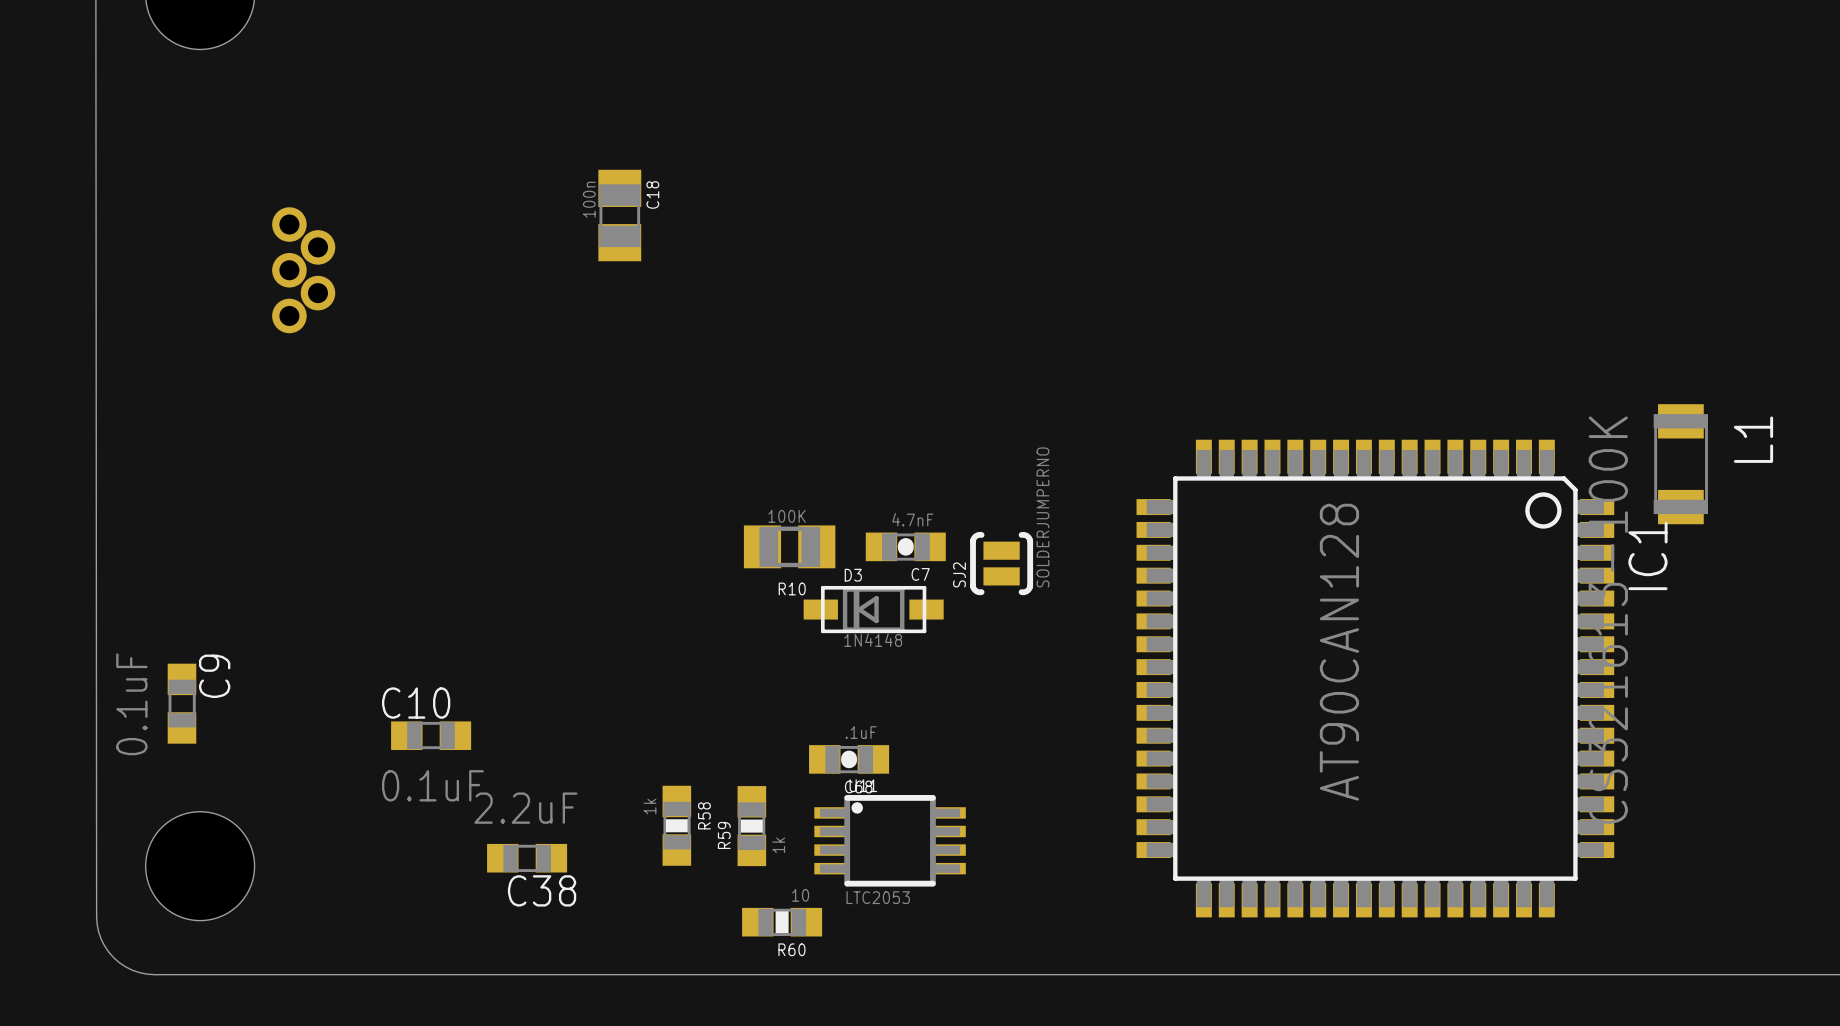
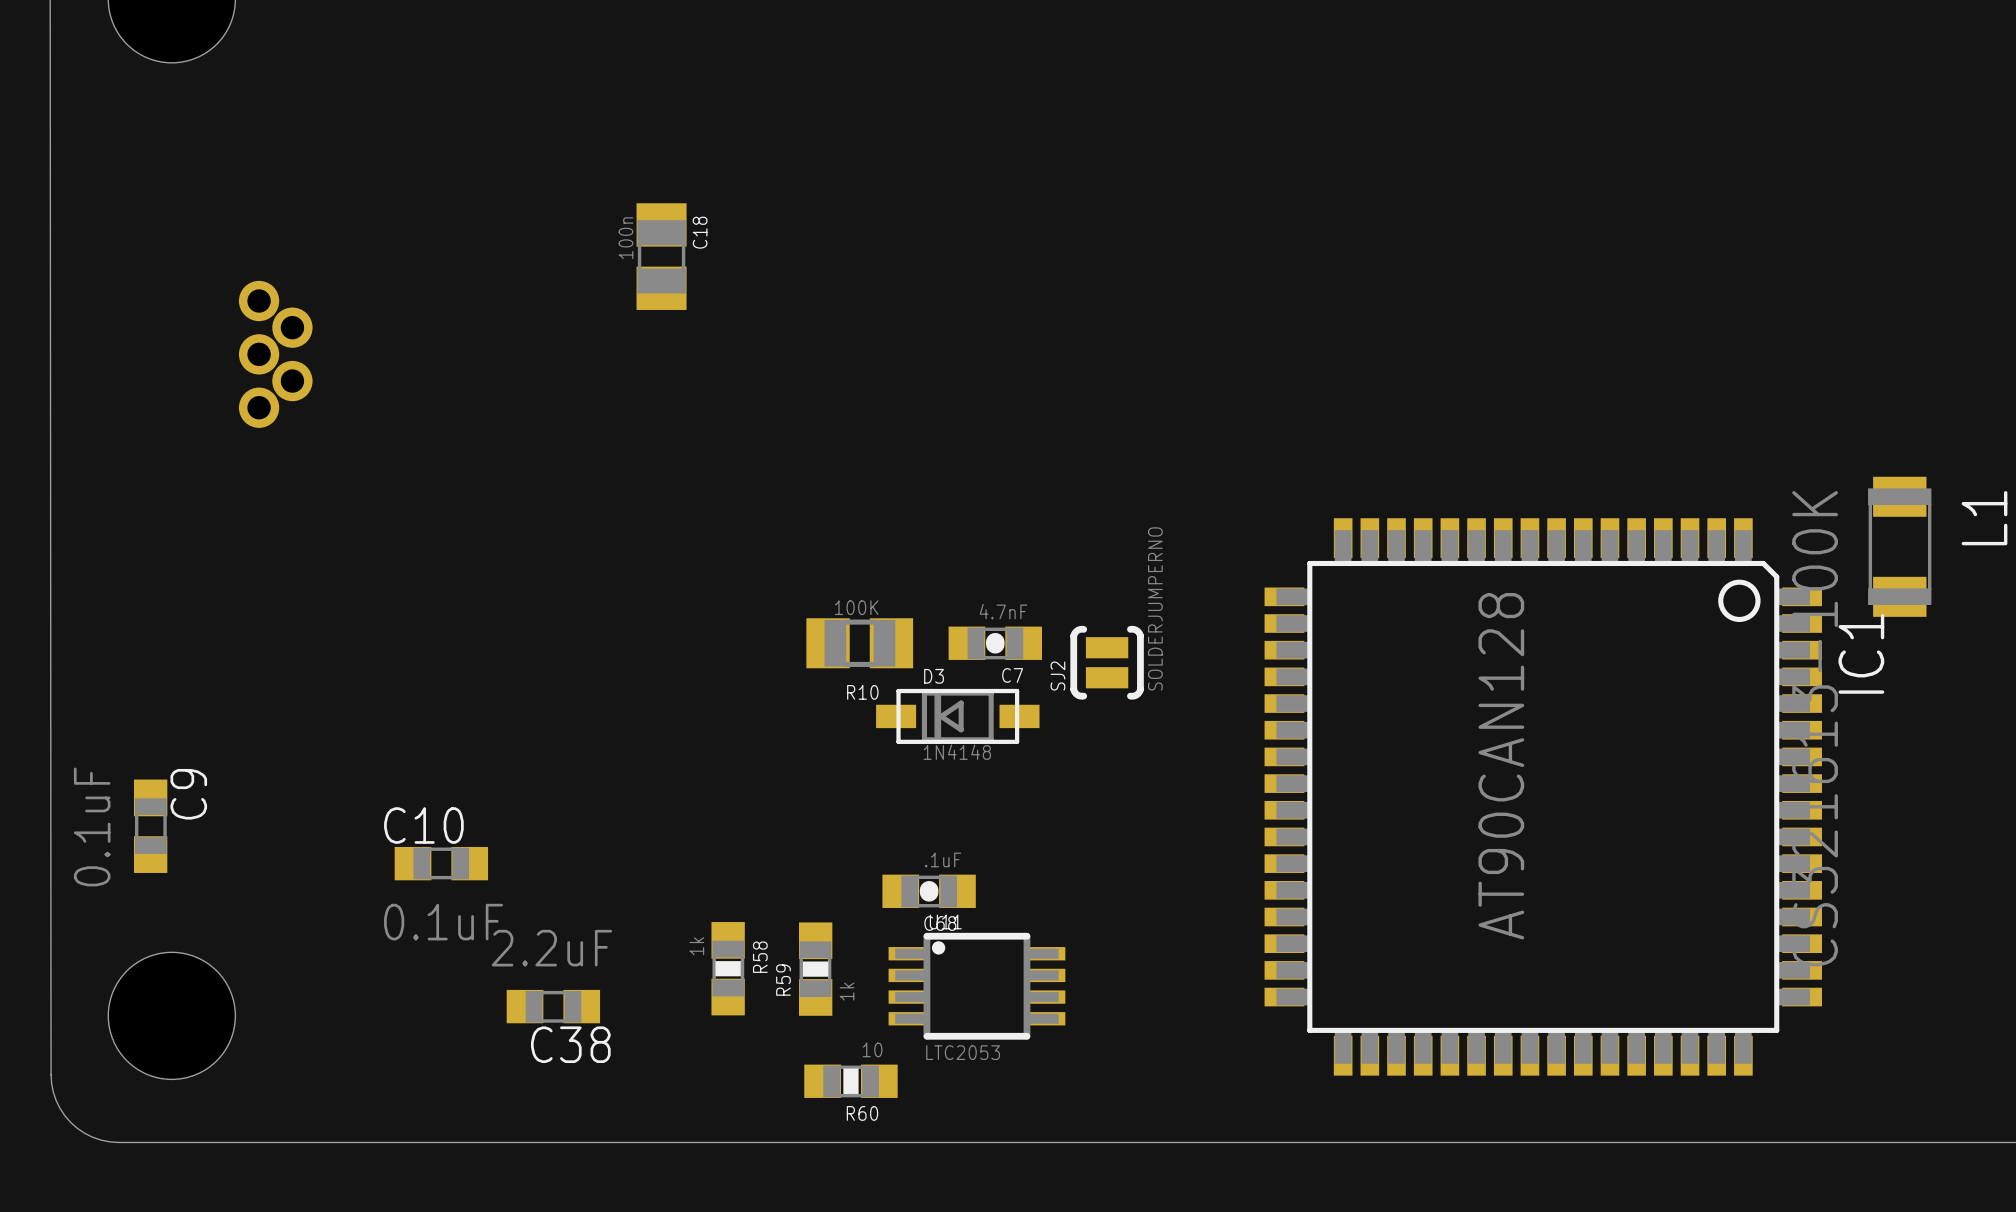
part position: (303, 270) -> (275, 354)

